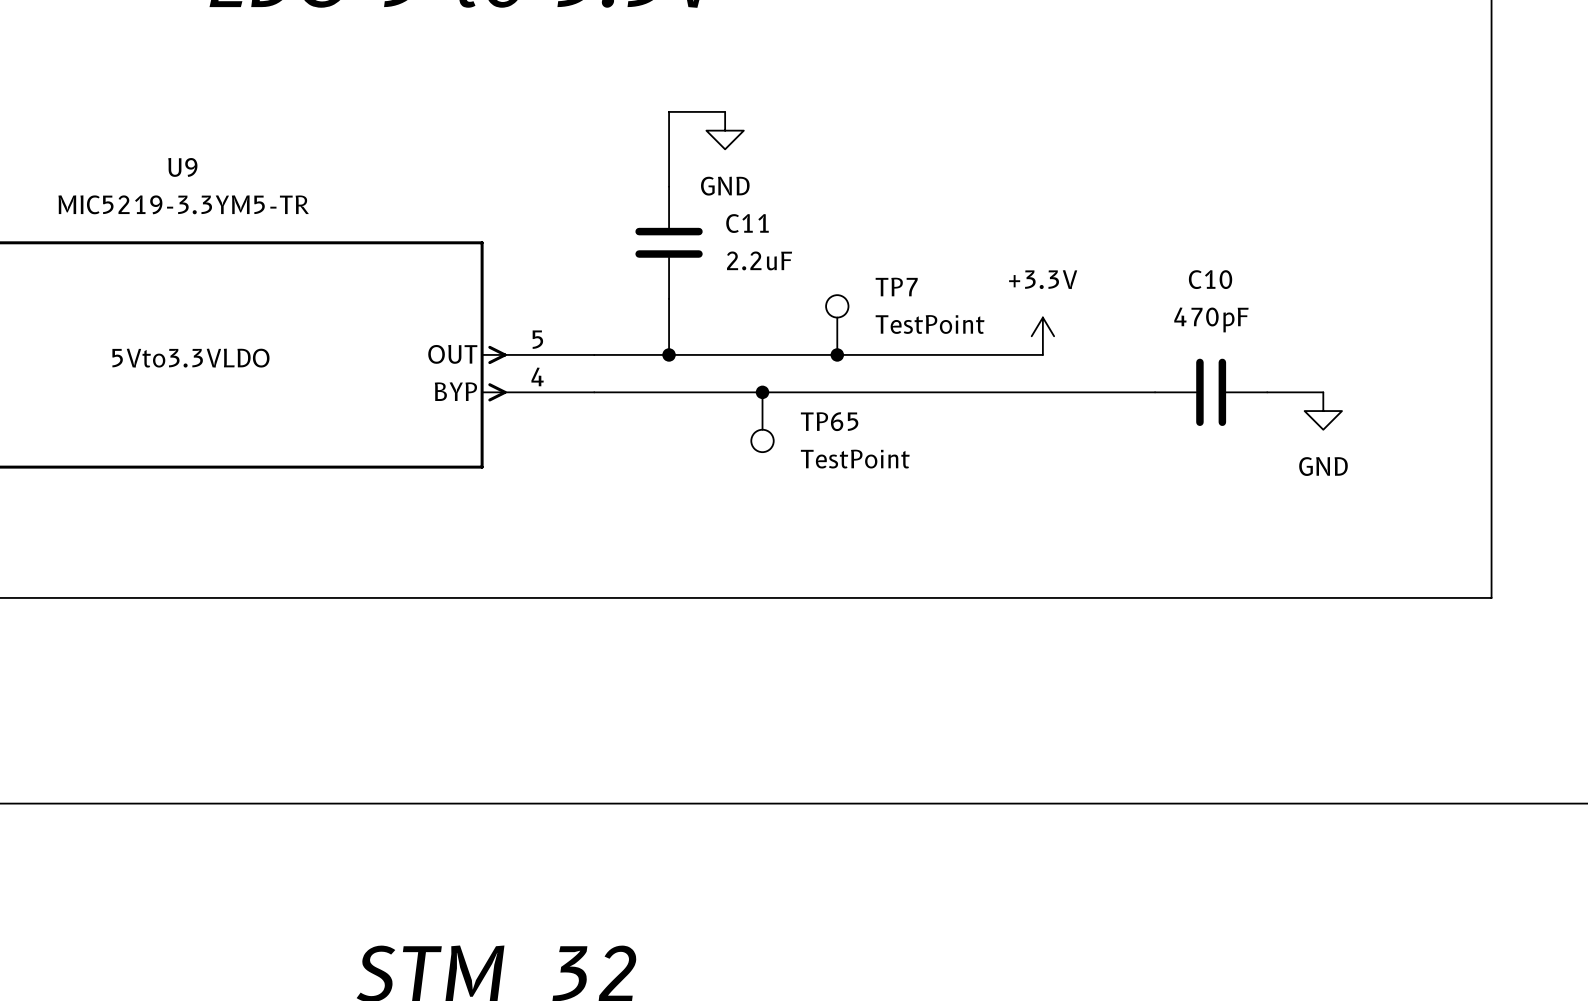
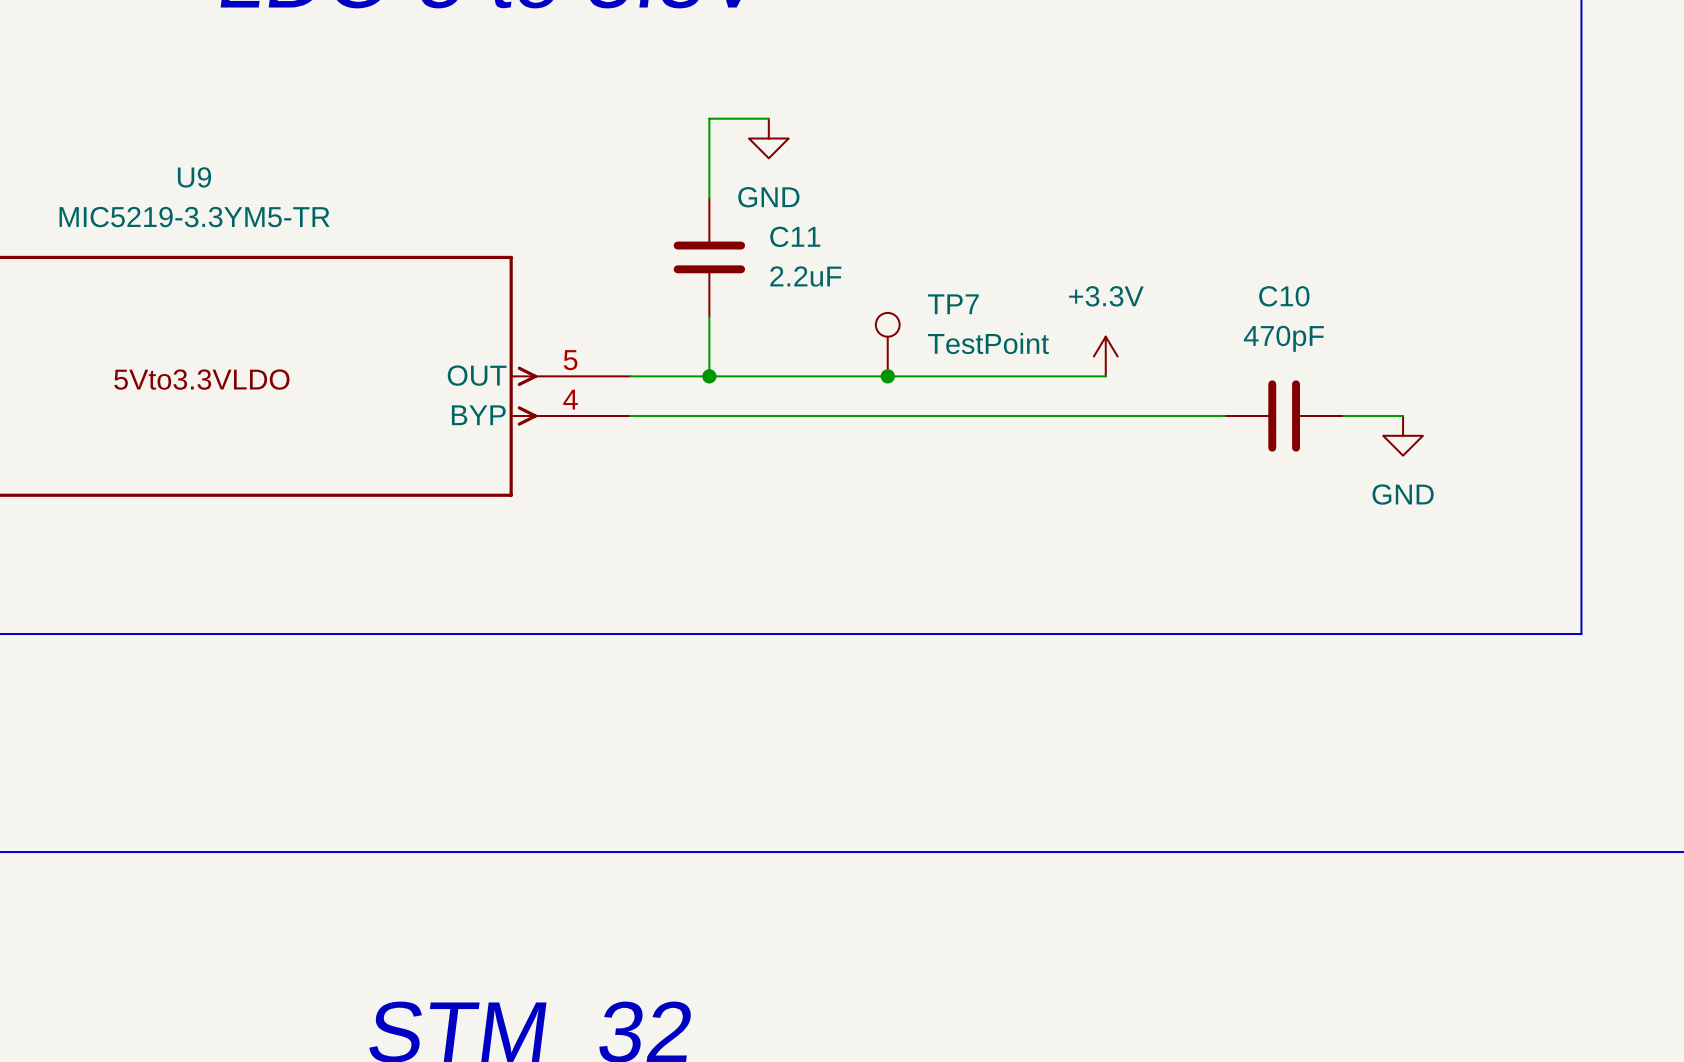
junction: (762, 392) -> none
TP65: TestPoint (762, 422) -> none

